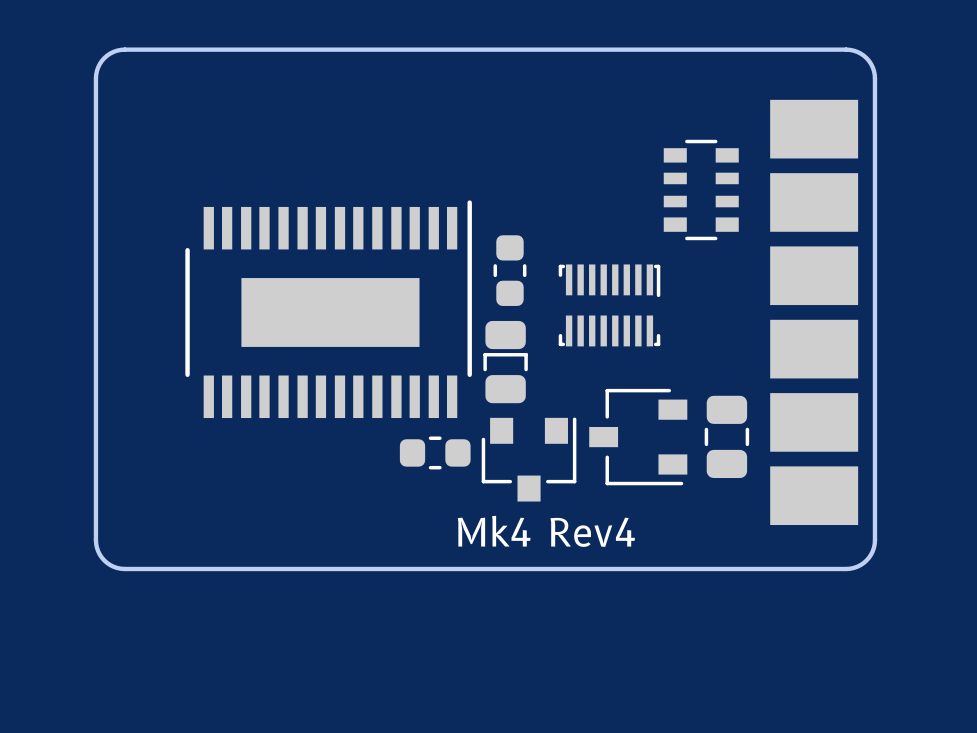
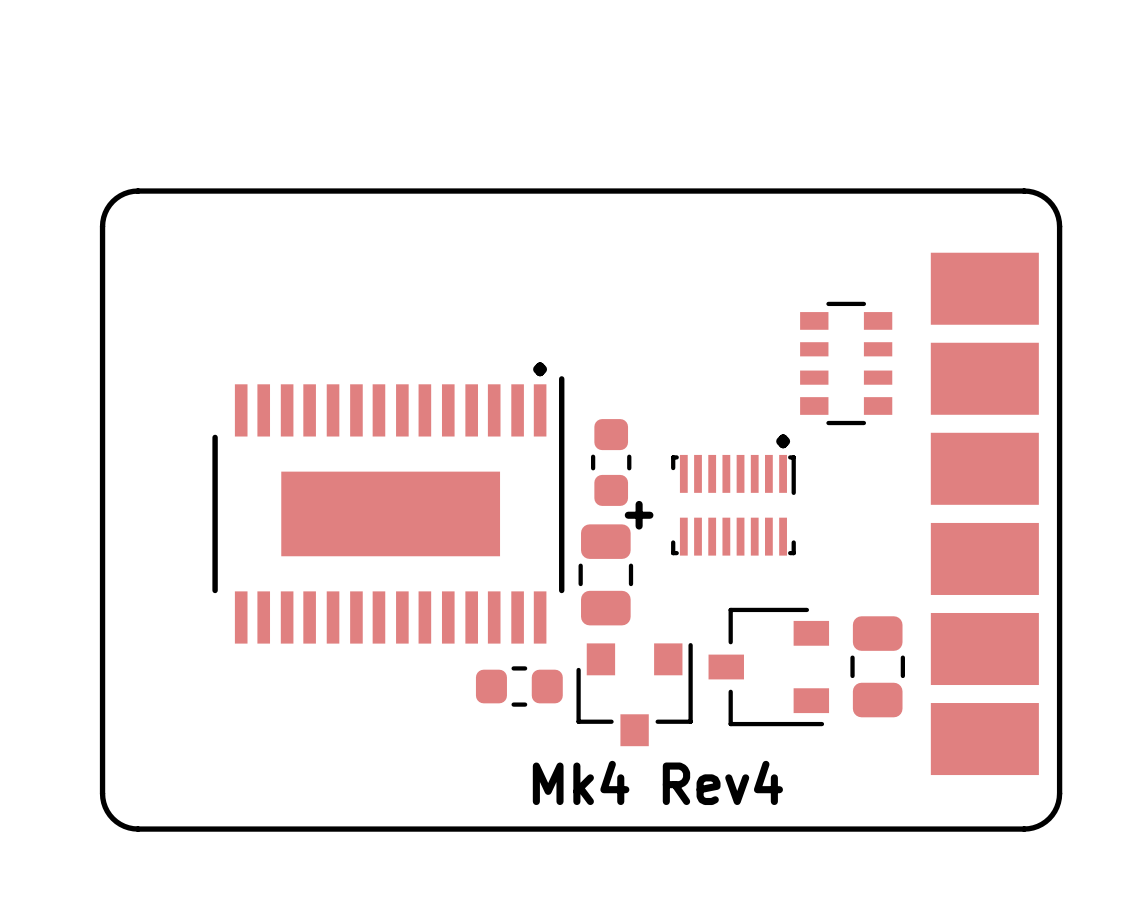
text: none -> . (540, 369)
text: none -> . (783, 441)
text: none -> + (639, 515)
part footprint: [483, 320, 528, 404] -> [578, 524, 634, 626]

